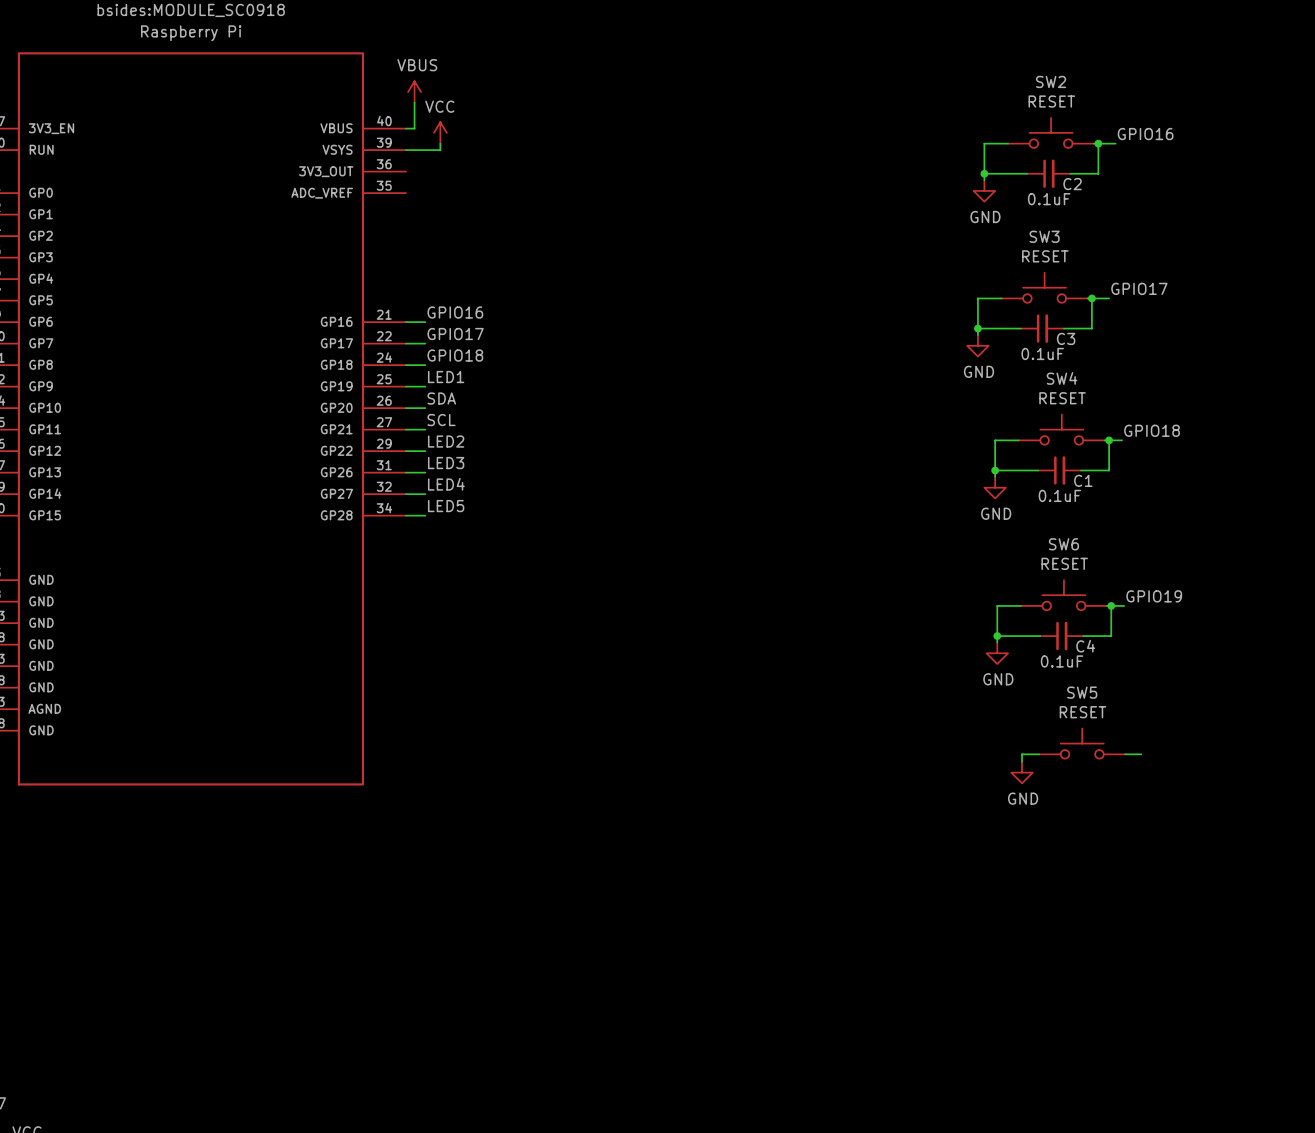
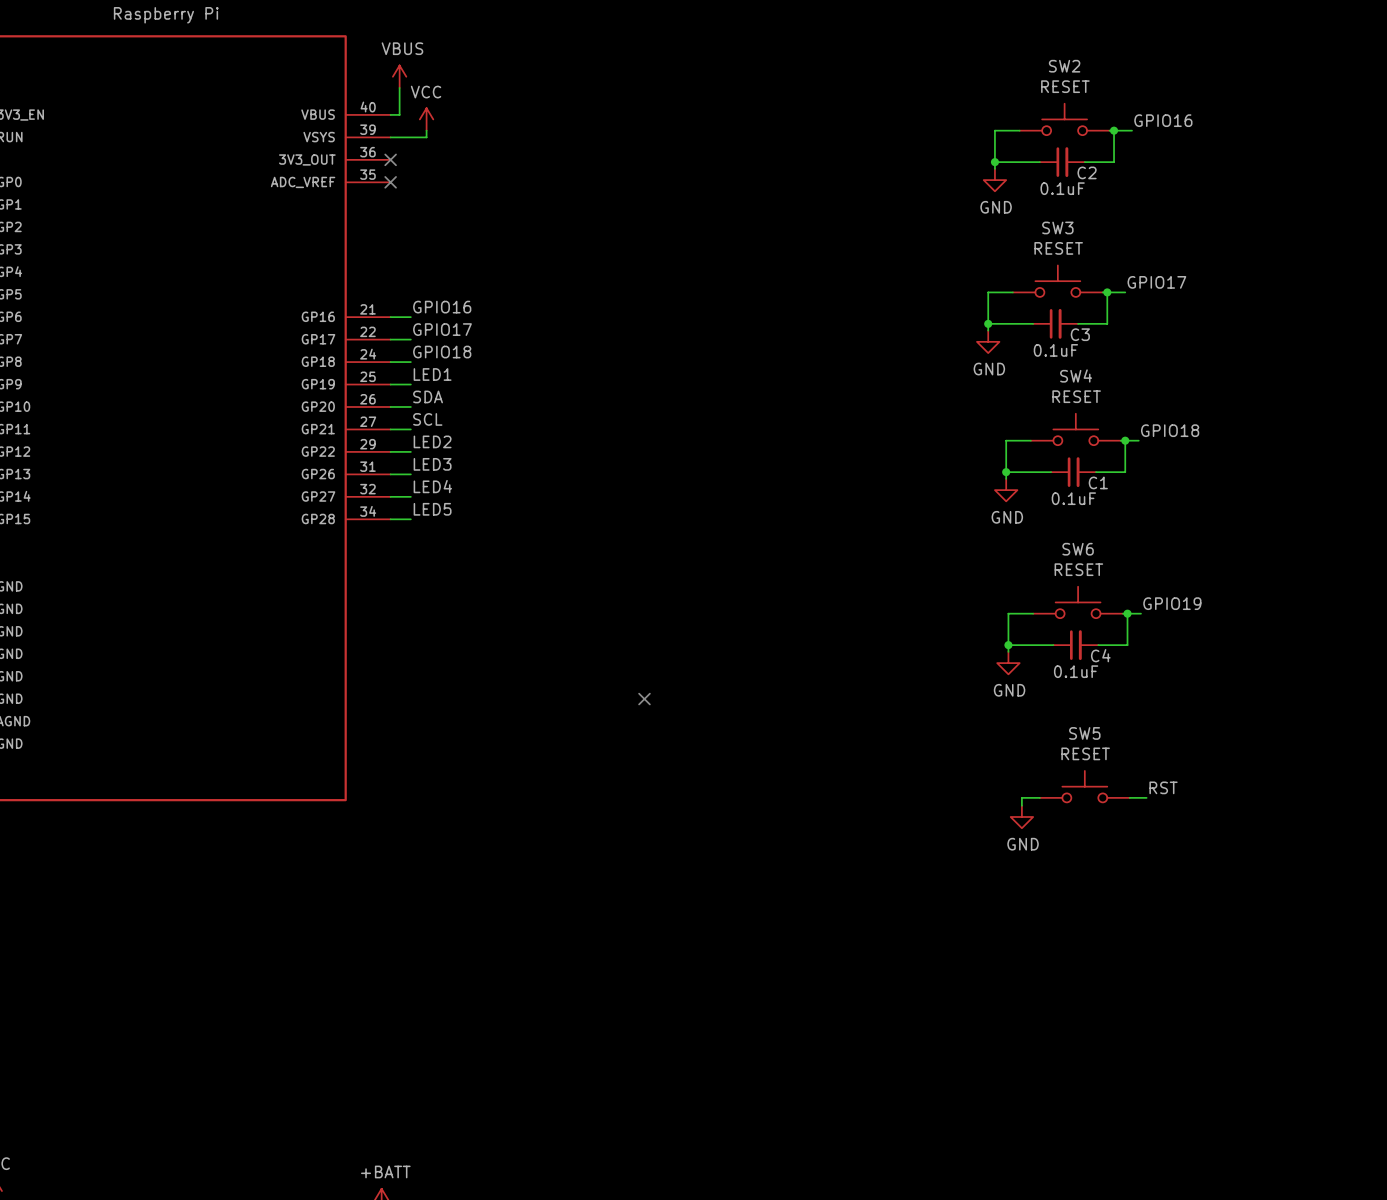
no-connect mark: none -> (390, 159)
no-connect mark: none -> (390, 182)
no-connect mark: none -> (644, 699)
SW5 position: (1082, 743) -> (1084, 786)
wire: (1039, 754) (1022, 754) (1022, 761) -> (1039, 797) (1021, 797) (1021, 805)
wire: (1125, 754) (1141, 754) -> (1129, 797) (1146, 797)
power symbol position: GND (1022, 772) -> GND (1021, 816)
label: none -> RST (1163, 787)

